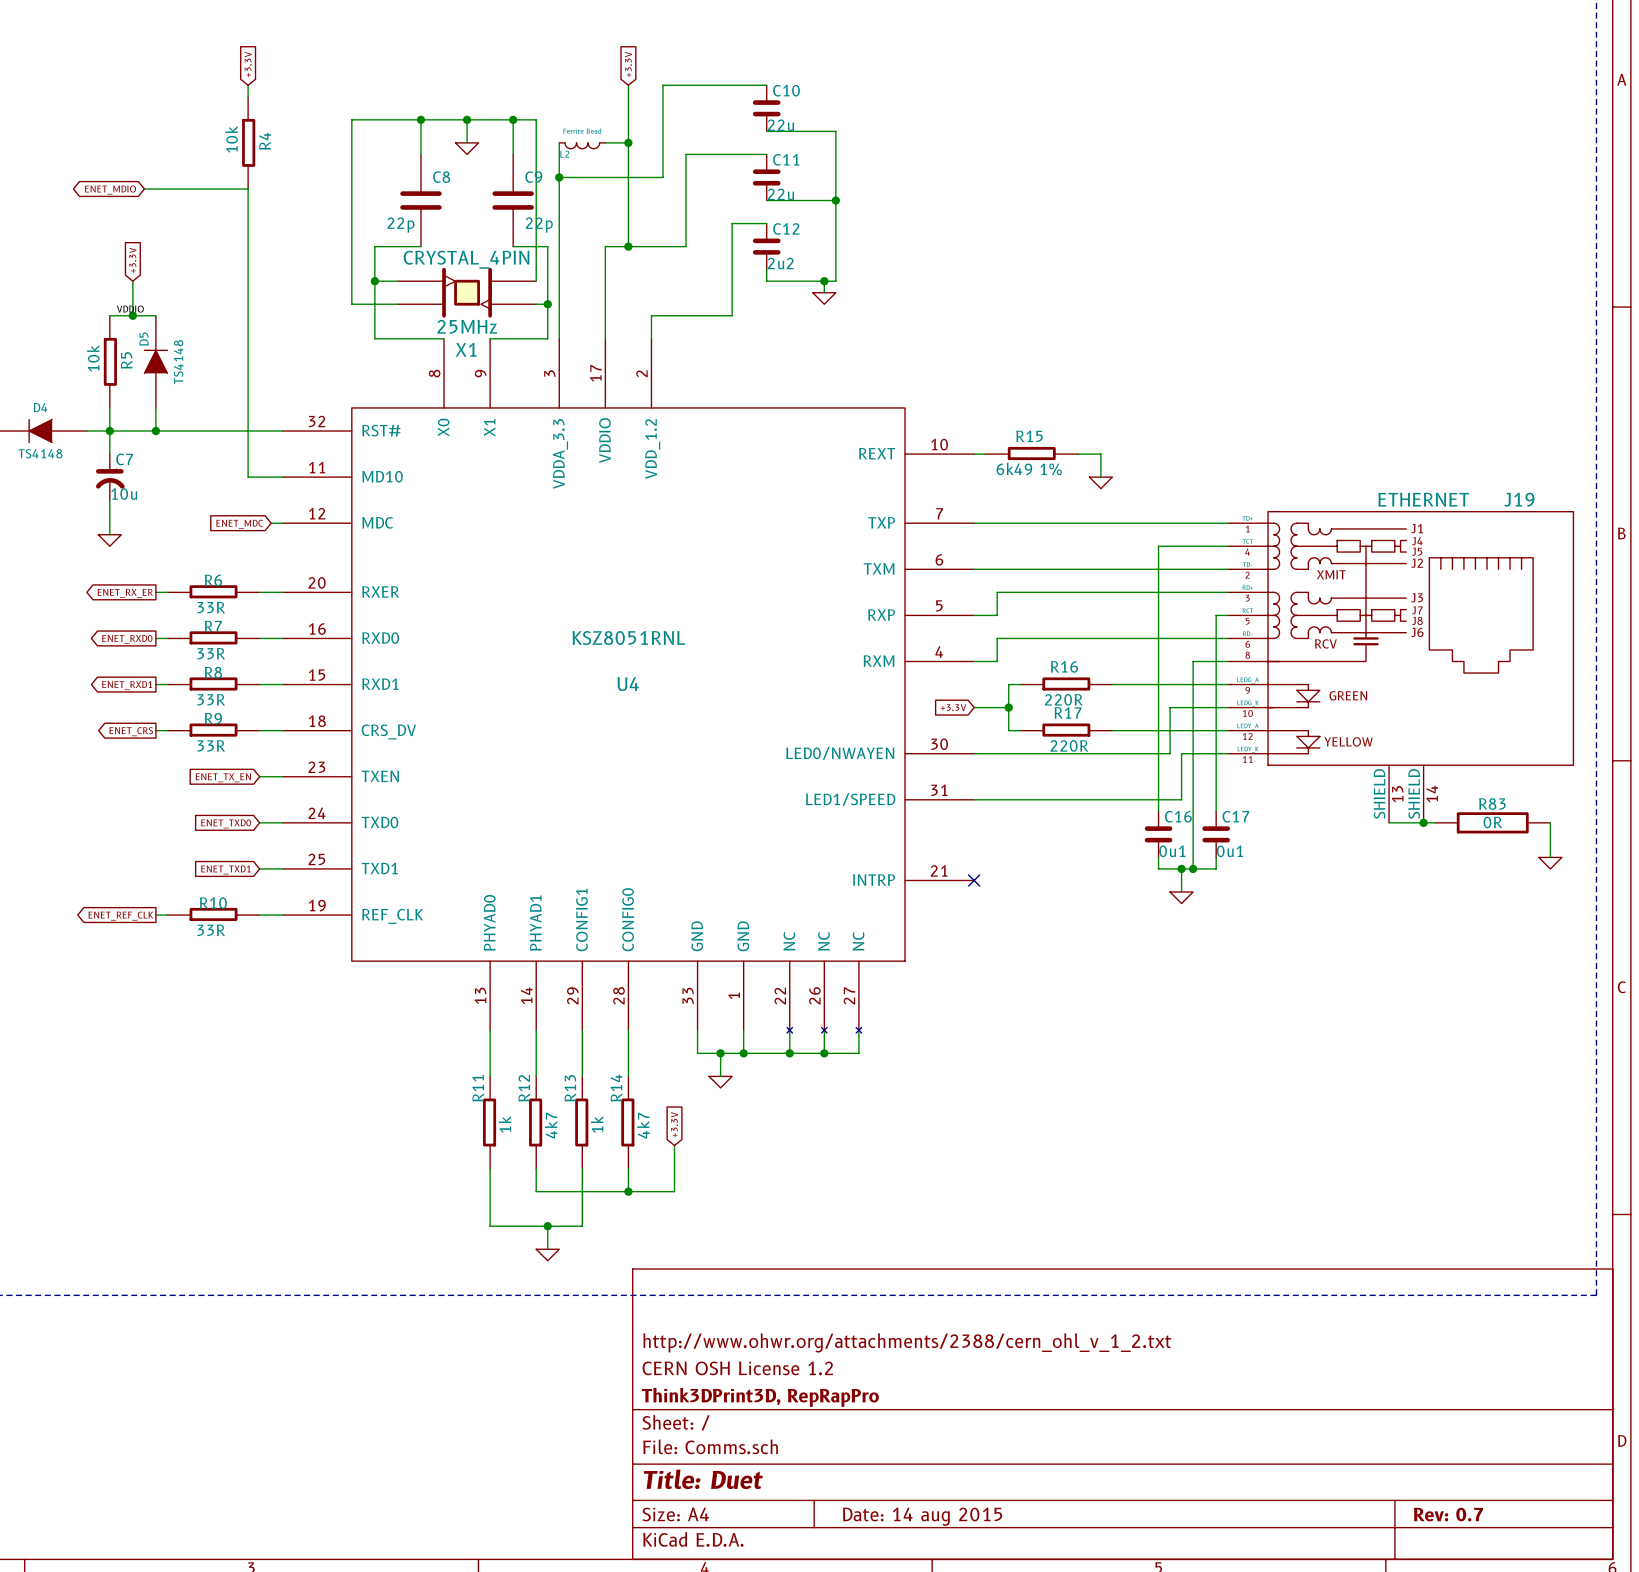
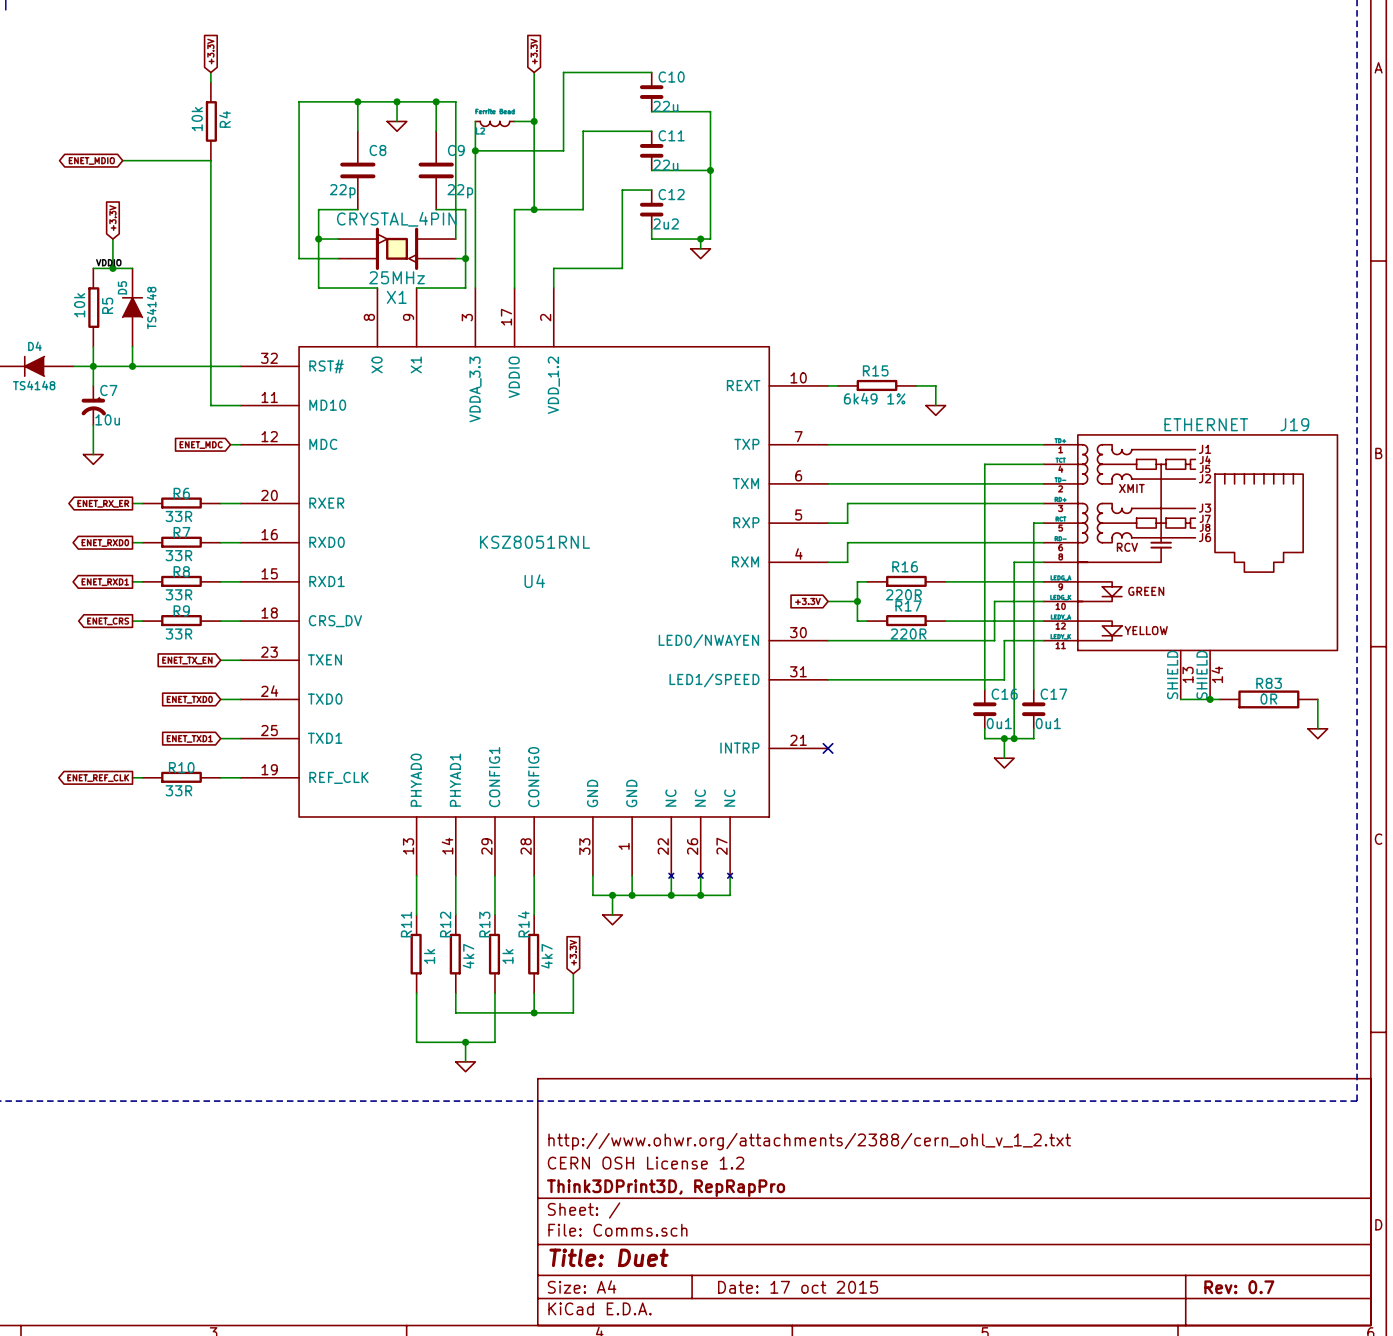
title block: Date: 14 aug 2015 (922, 1516) -> Date: 17 oct 2015 (798, 1287)

